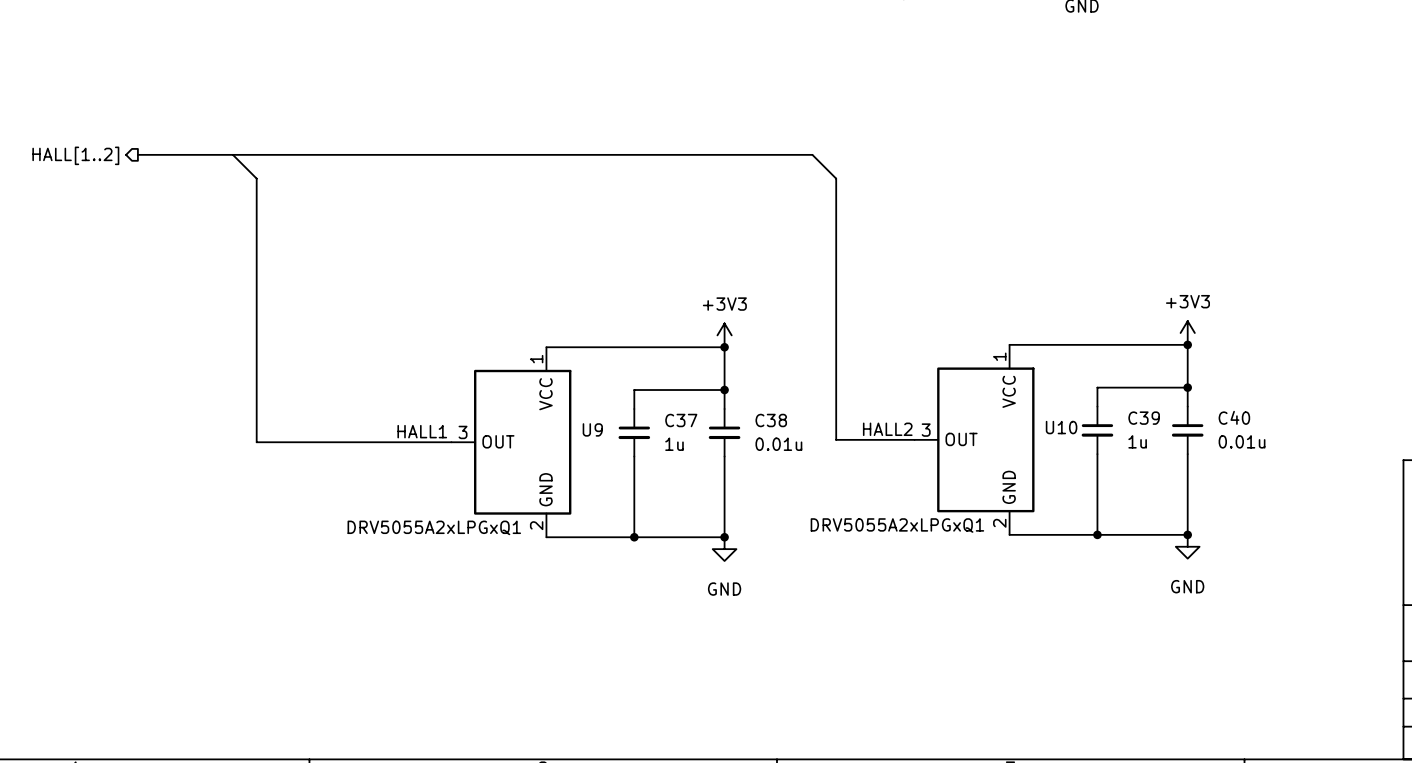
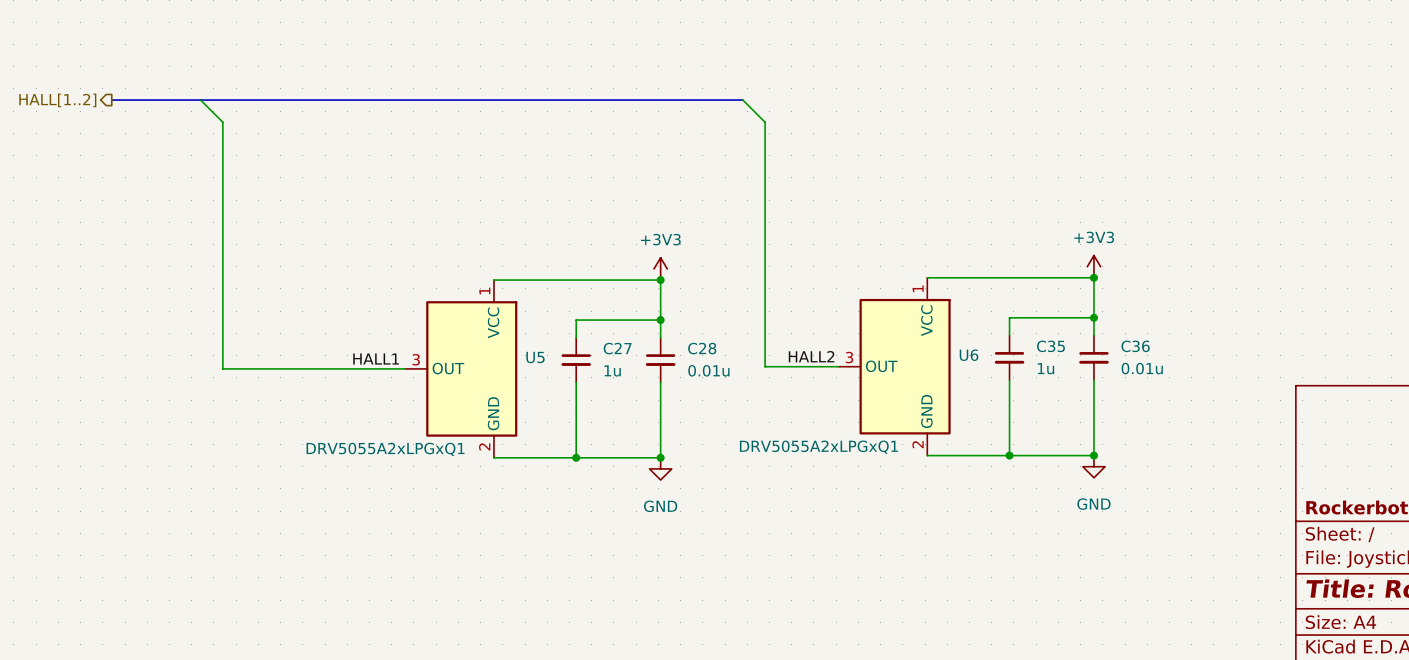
C40 name: C40 (1234, 417) -> C36 (1135, 346)
C39 name: C39 (1144, 418) -> C35 (1050, 346)
C37 name: C37 (681, 420) -> C27 (617, 348)
C38 name: C38 (771, 420) -> C28 (702, 348)
U10 name: U10 (1061, 427) -> U6 (969, 355)
U9 name: U9 (592, 429) -> U5 (535, 357)

